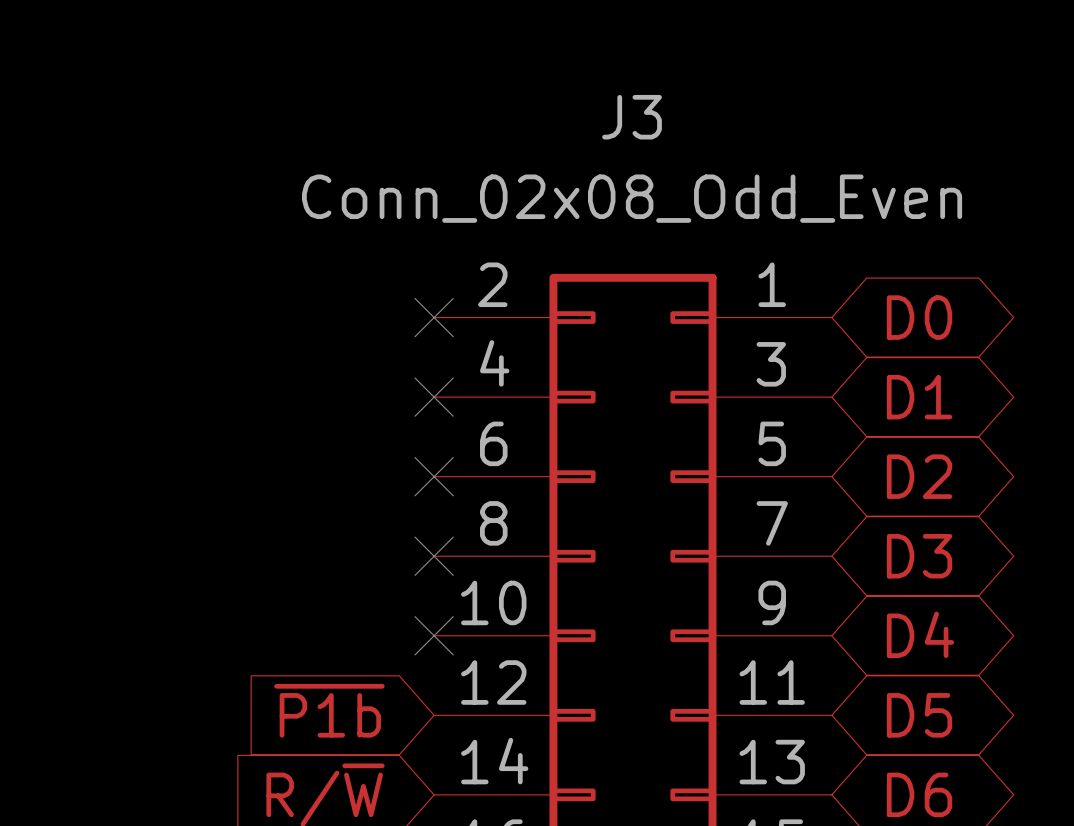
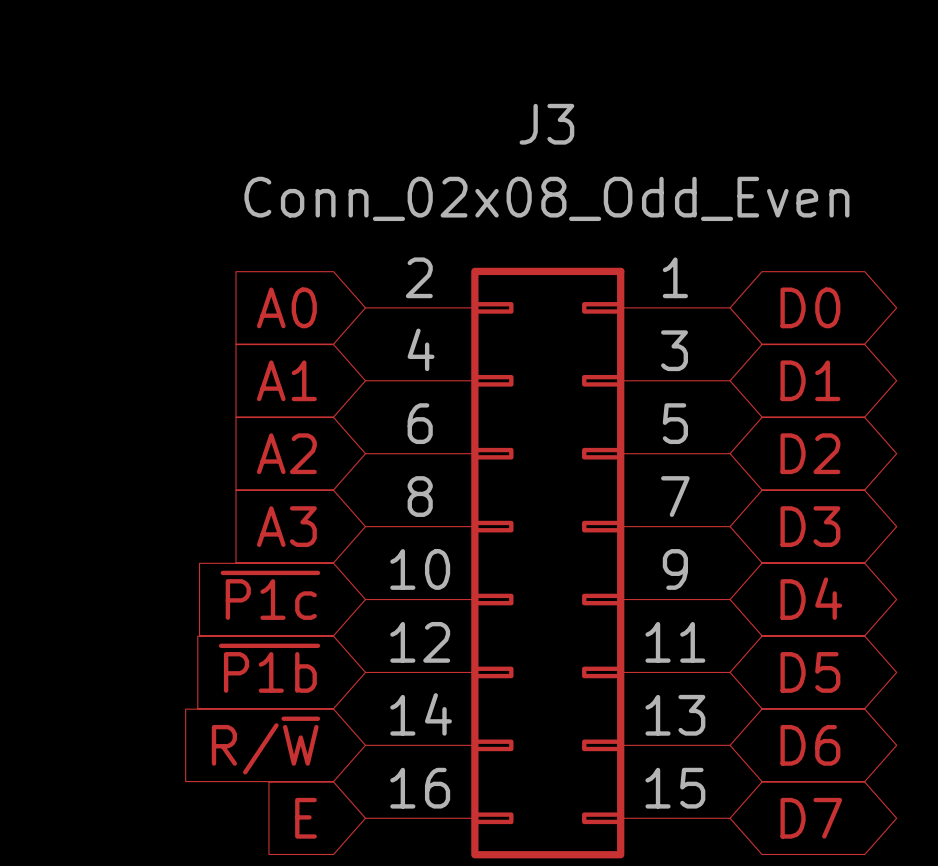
global label: none -> A0 (286, 307)
no-connect mark: (434, 317) -> none
global label: none -> A1 (286, 380)
no-connect mark: (434, 397) -> none
global label: none -> A2 (286, 453)
no-connect mark: (434, 476) -> none
global label: none -> A3 (286, 526)
no-connect mark: (434, 556) -> none
global label: none -> ~{P1c} (270, 595)
no-connect mark: (434, 635) -> none

